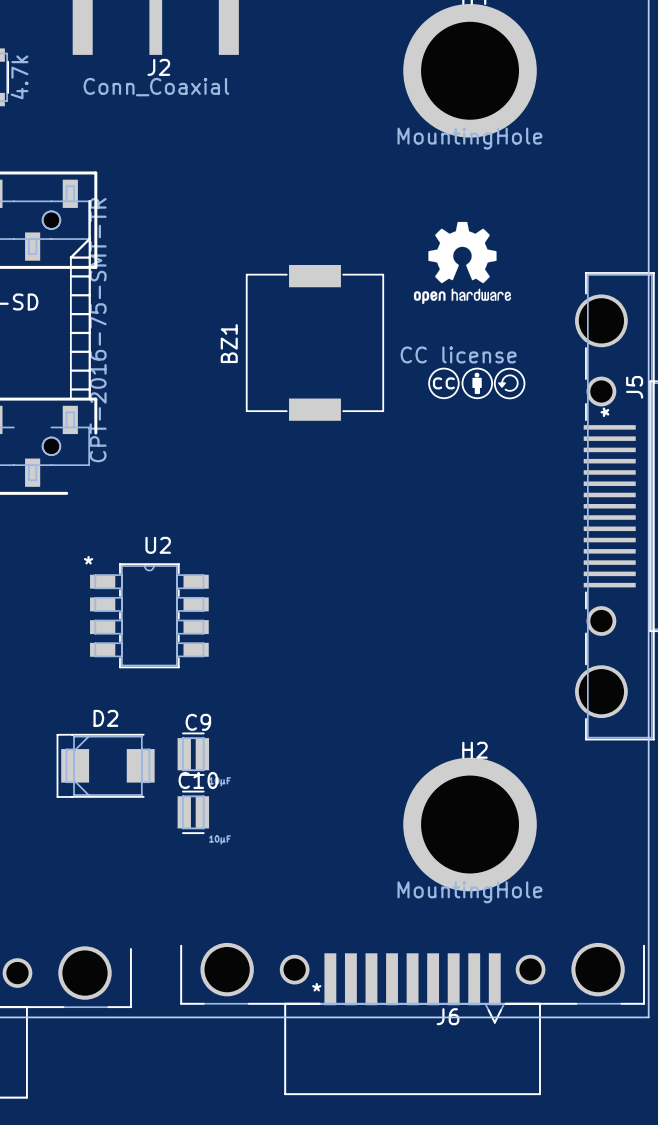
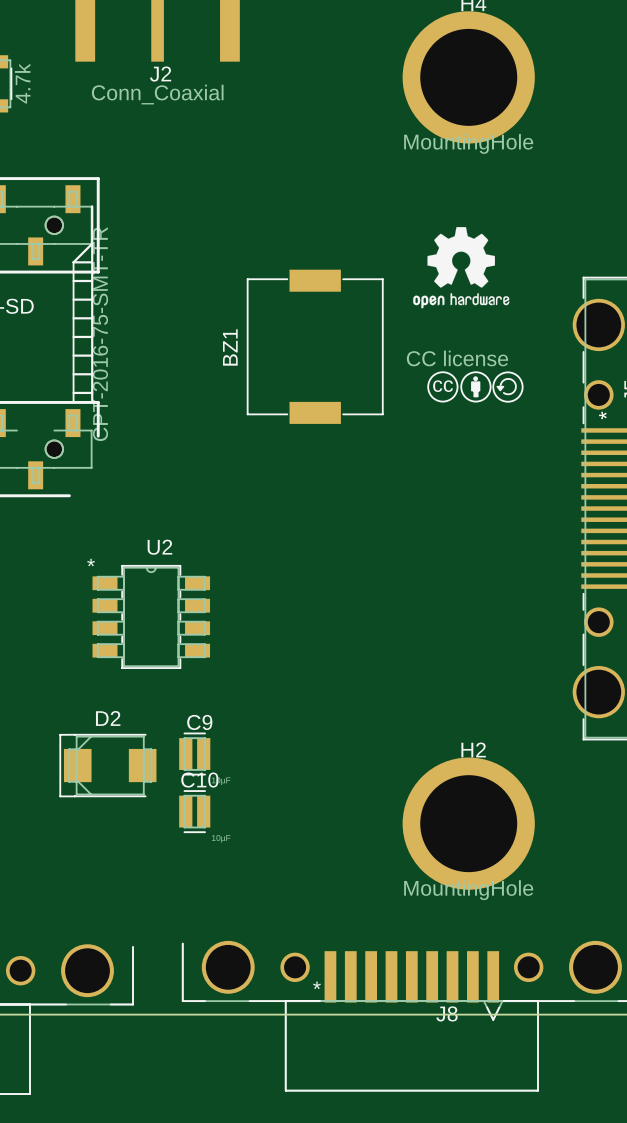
J6 name: J6 (448, 1016) -> J8 (446, 1013)

